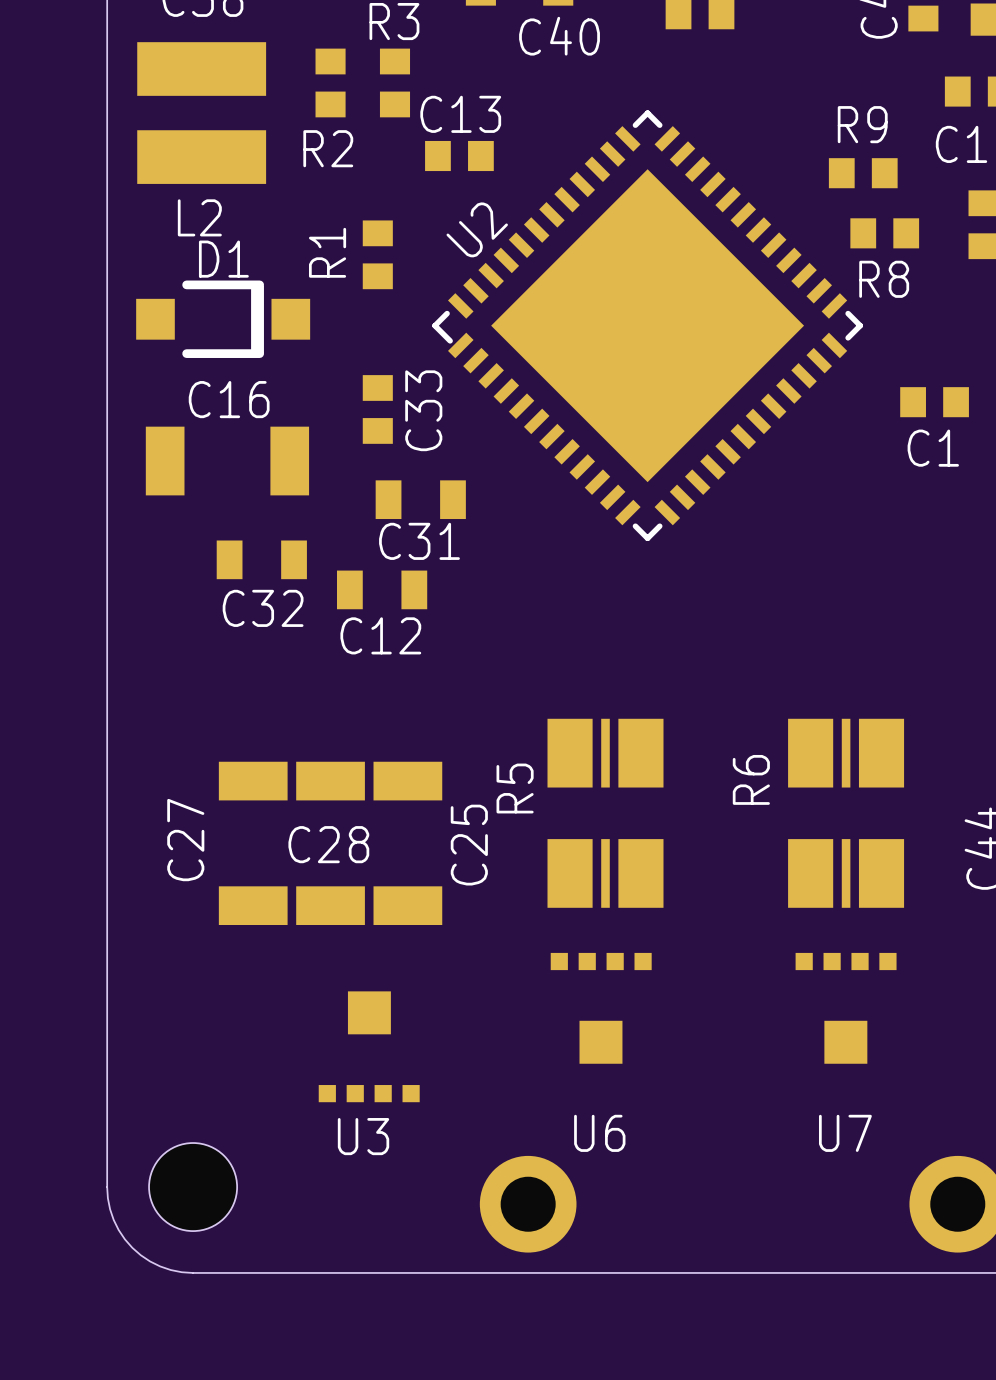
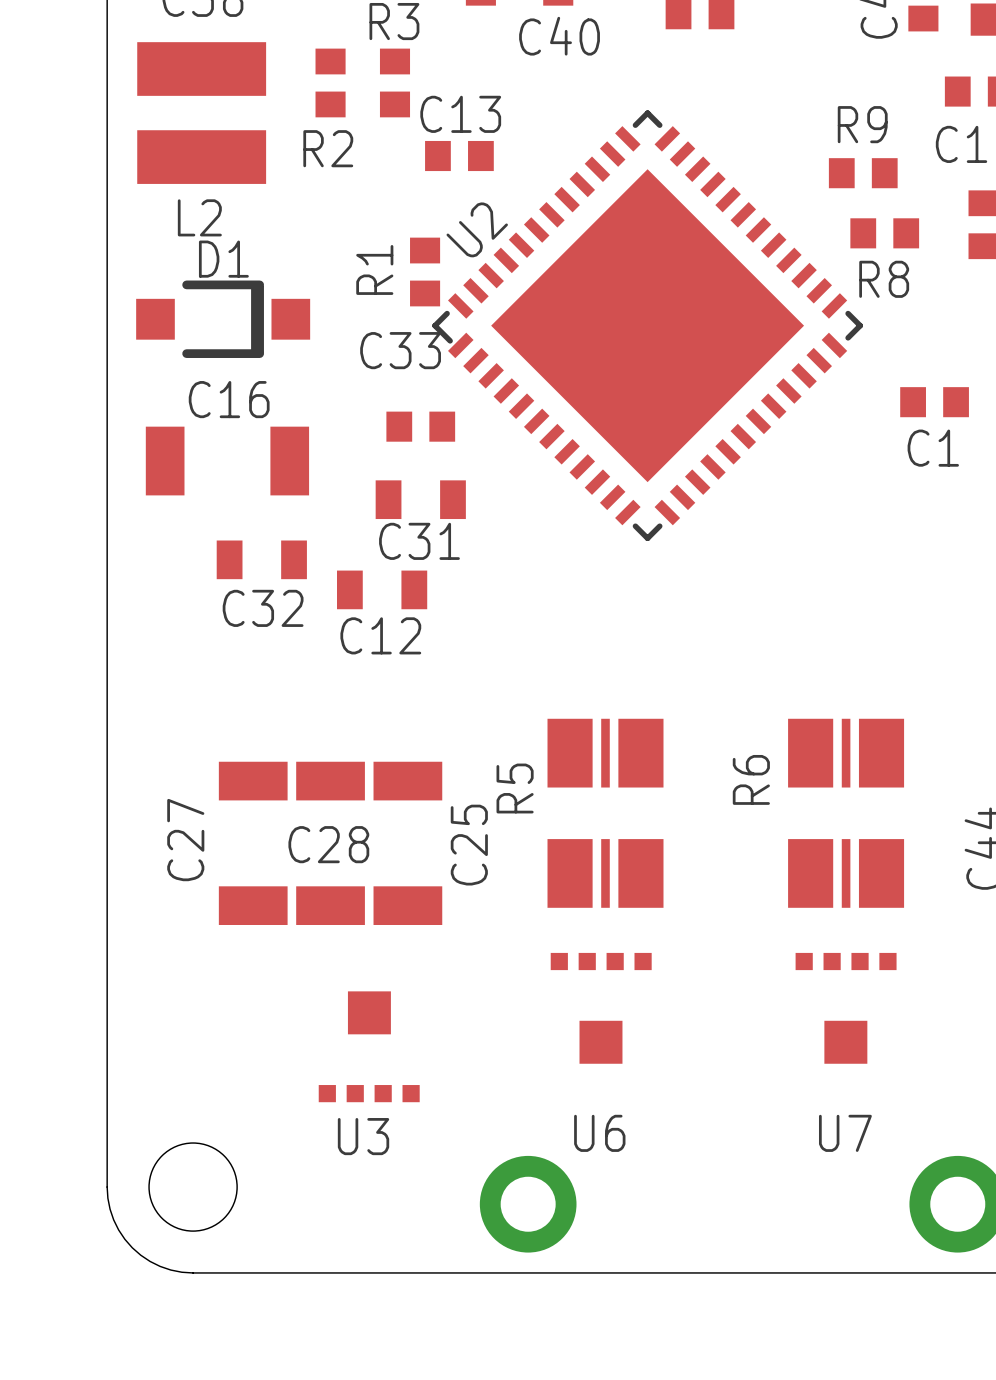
R1 position: (377, 254) -> (425, 272)
C33 rotation: 0° (377, 409) -> 90° clockwise (420, 426)
C33 position: (377, 409) -> (420, 426)
C33 name position: C33 (423, 410) -> C33 (400, 350)

